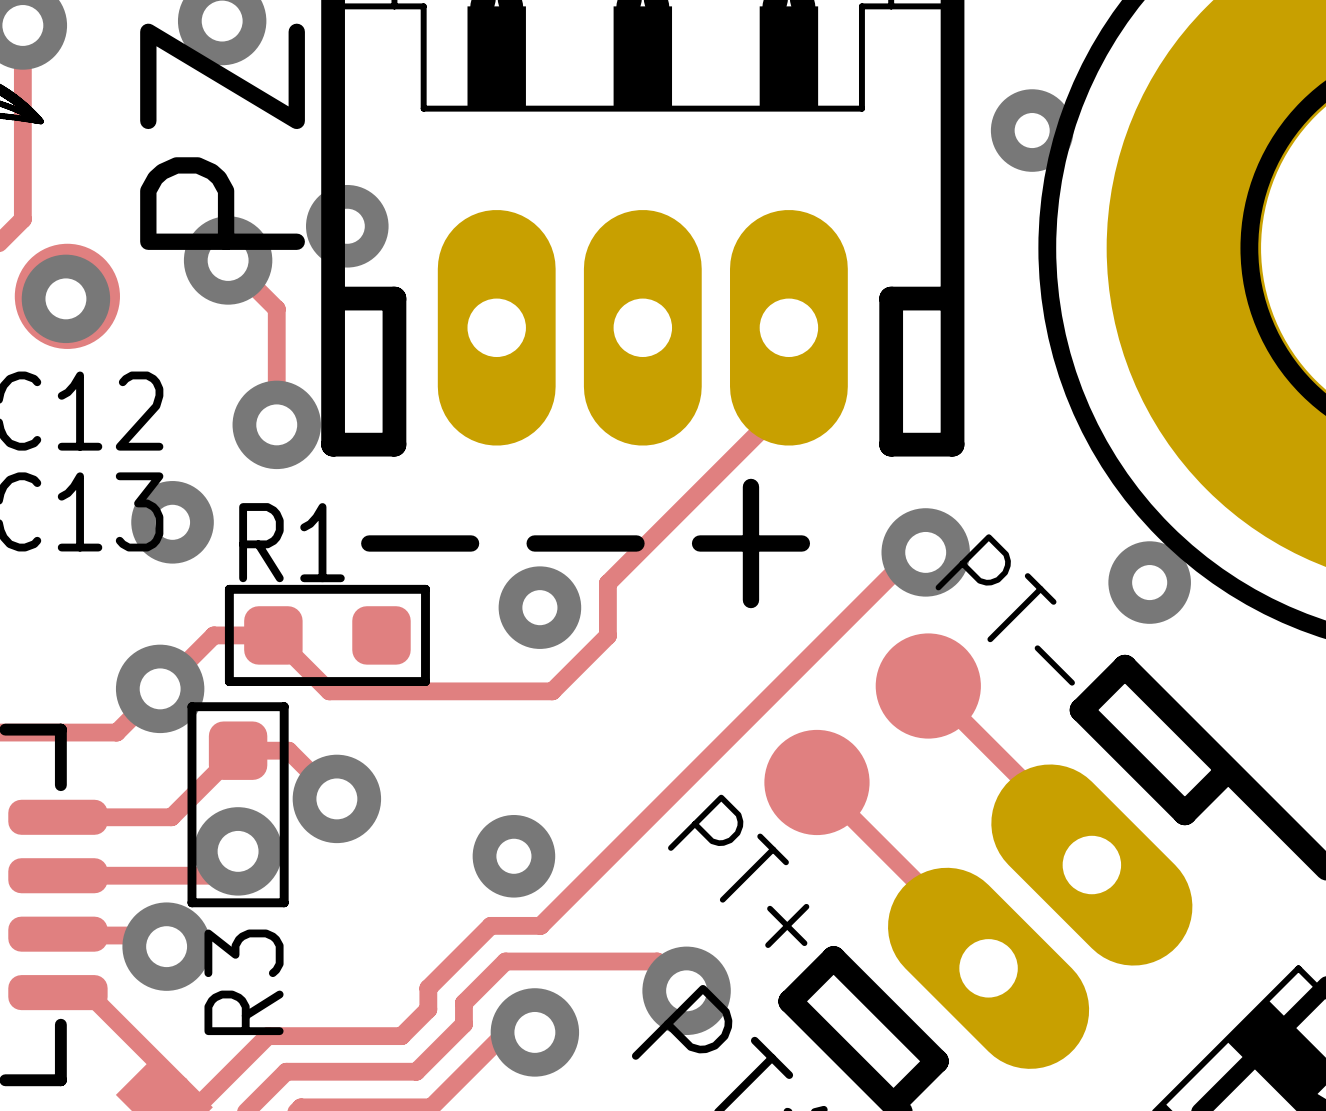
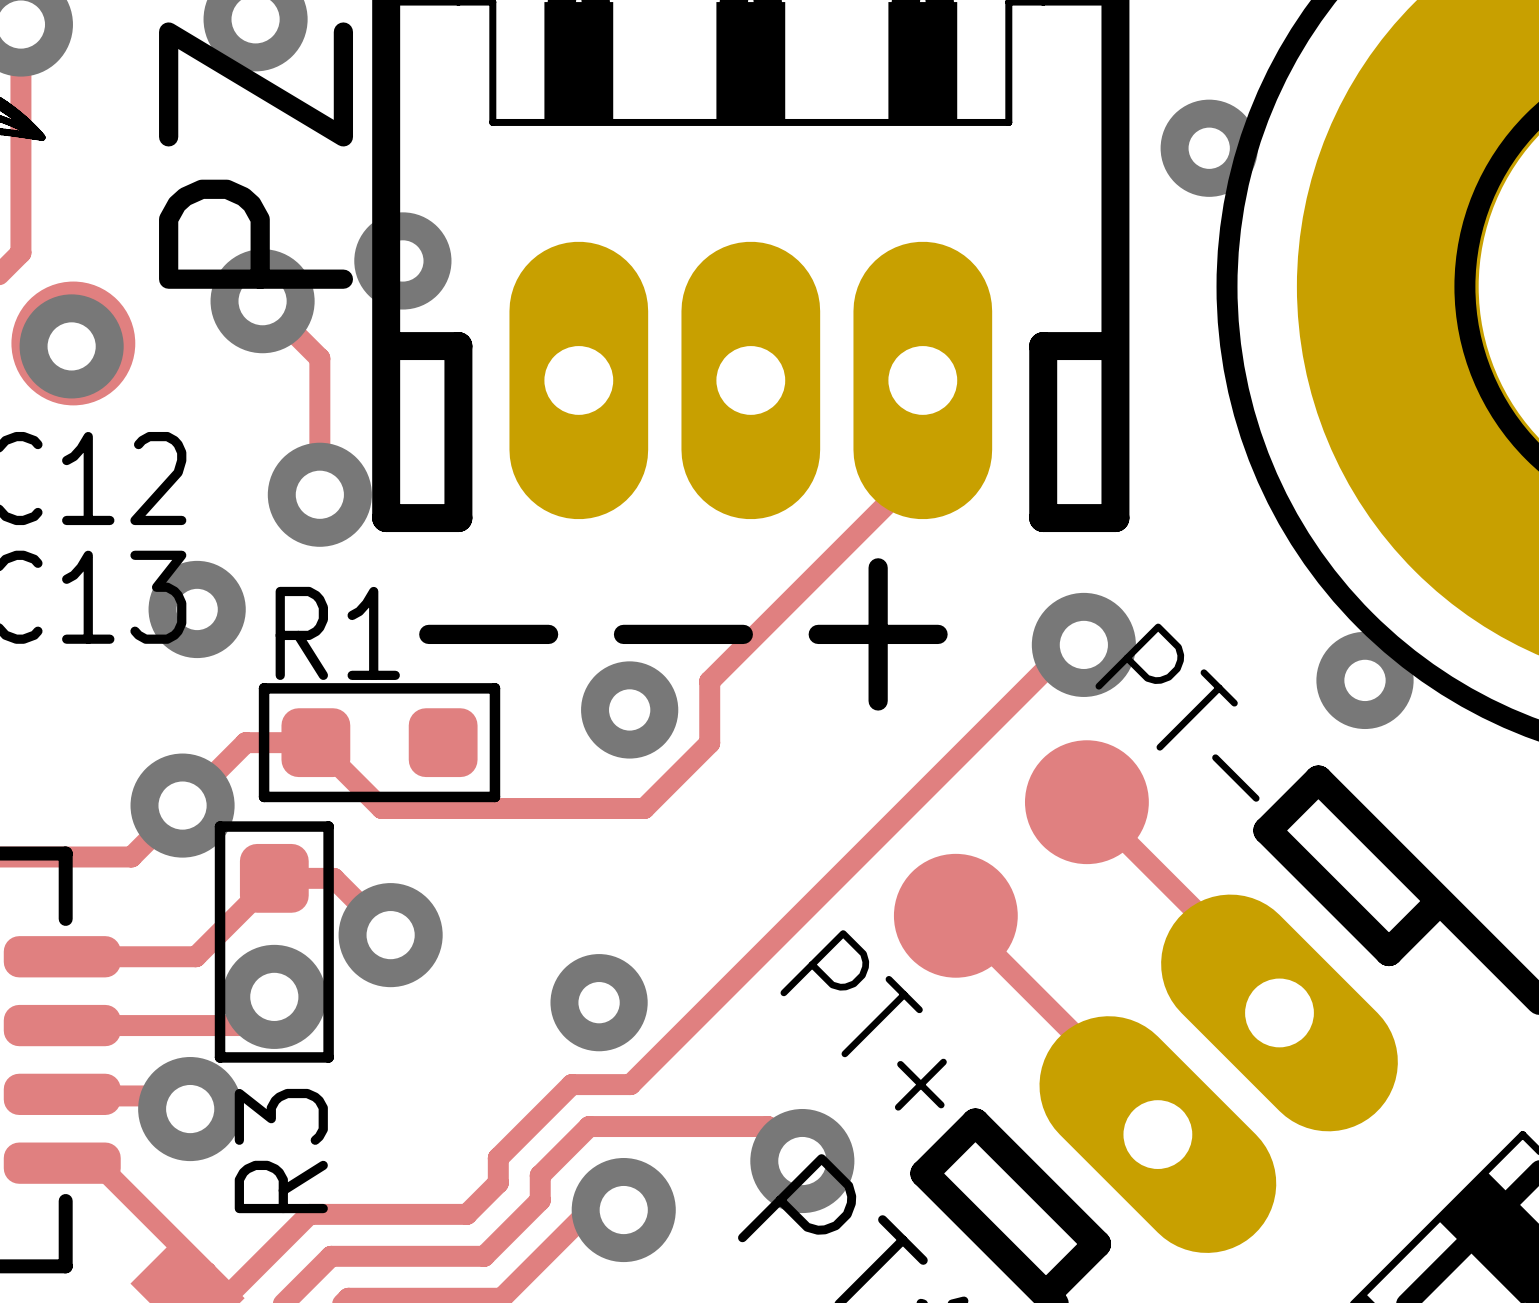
via position: (1149, 582) -> (1365, 680)

